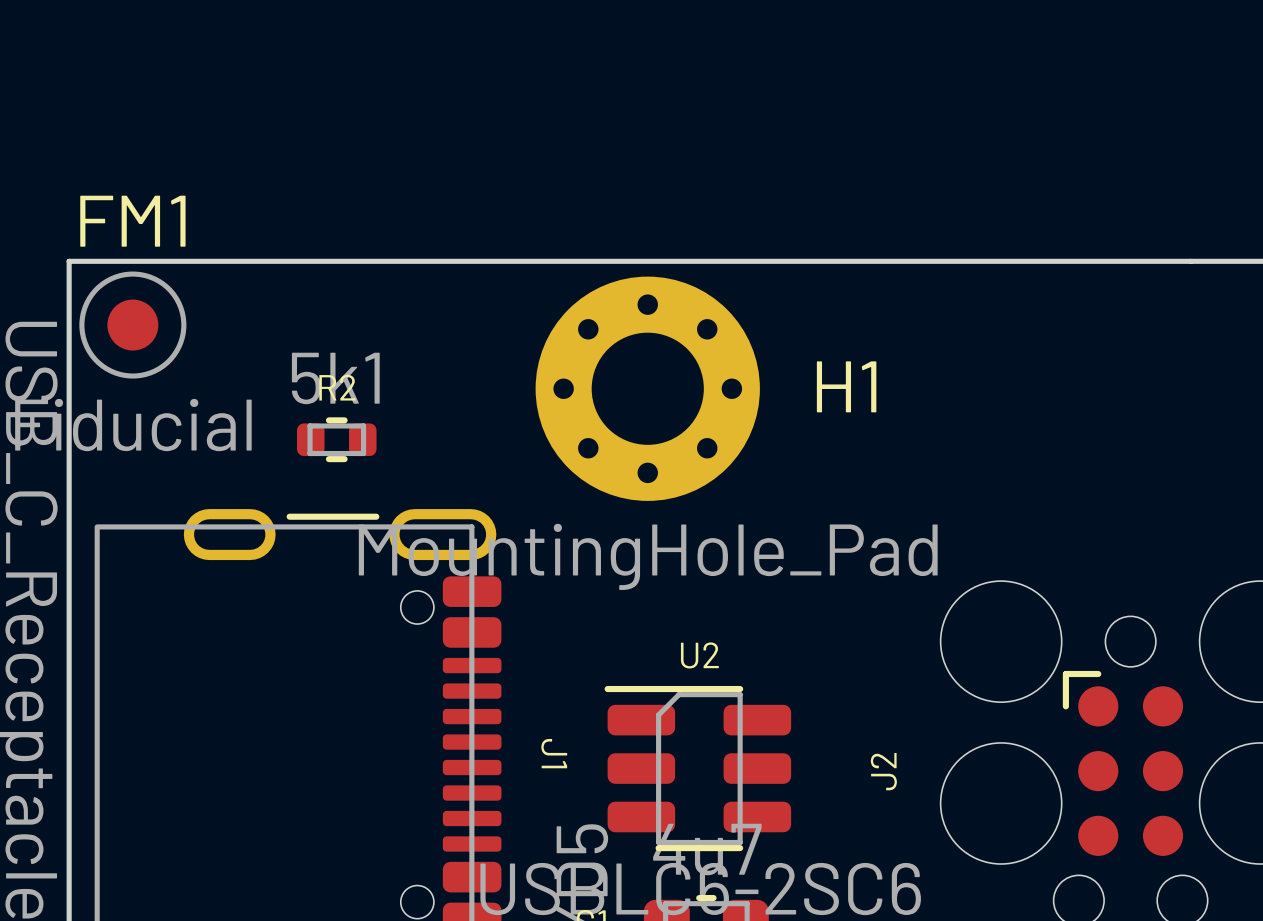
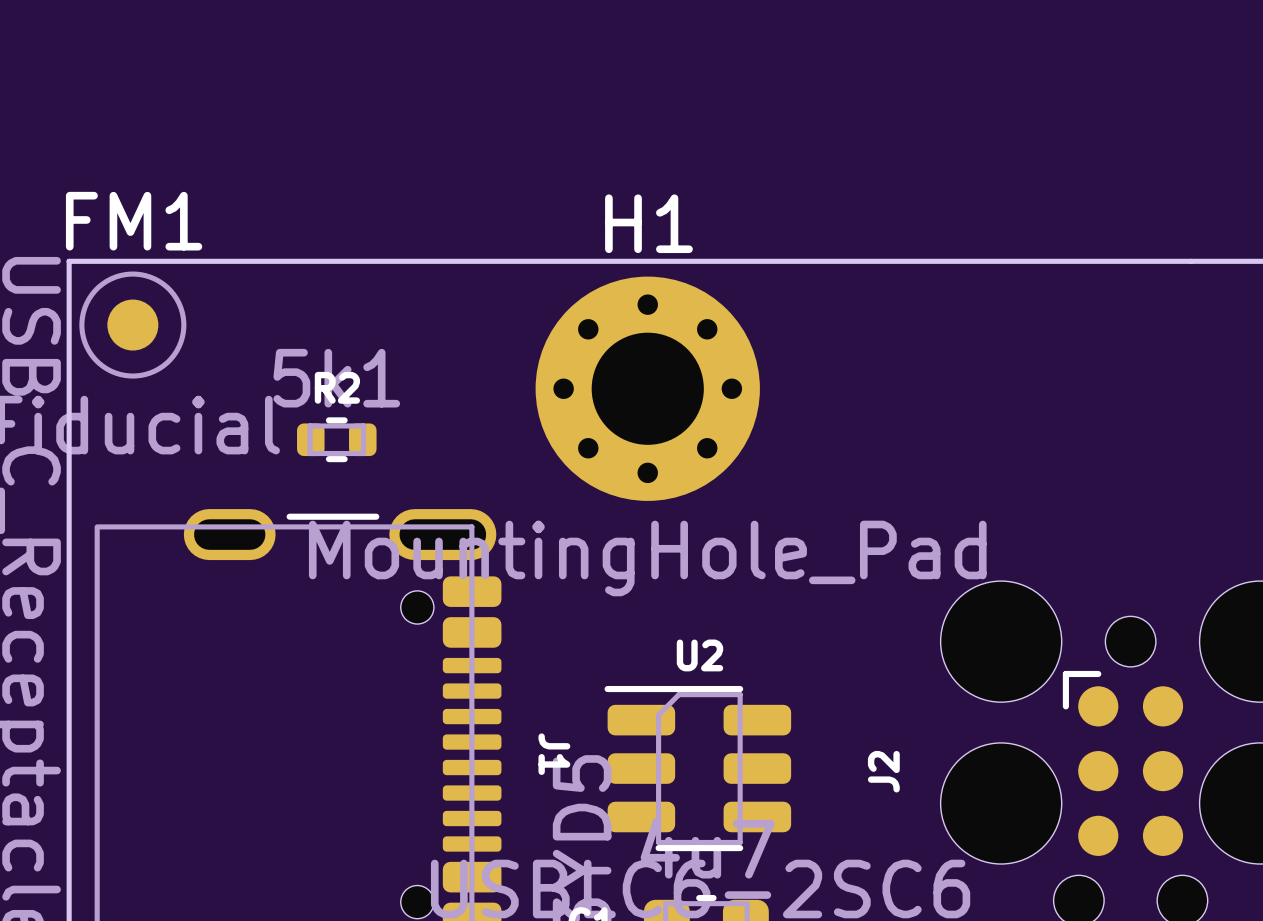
H1 name position: H1 (846, 386) -> H1 (648, 223)

